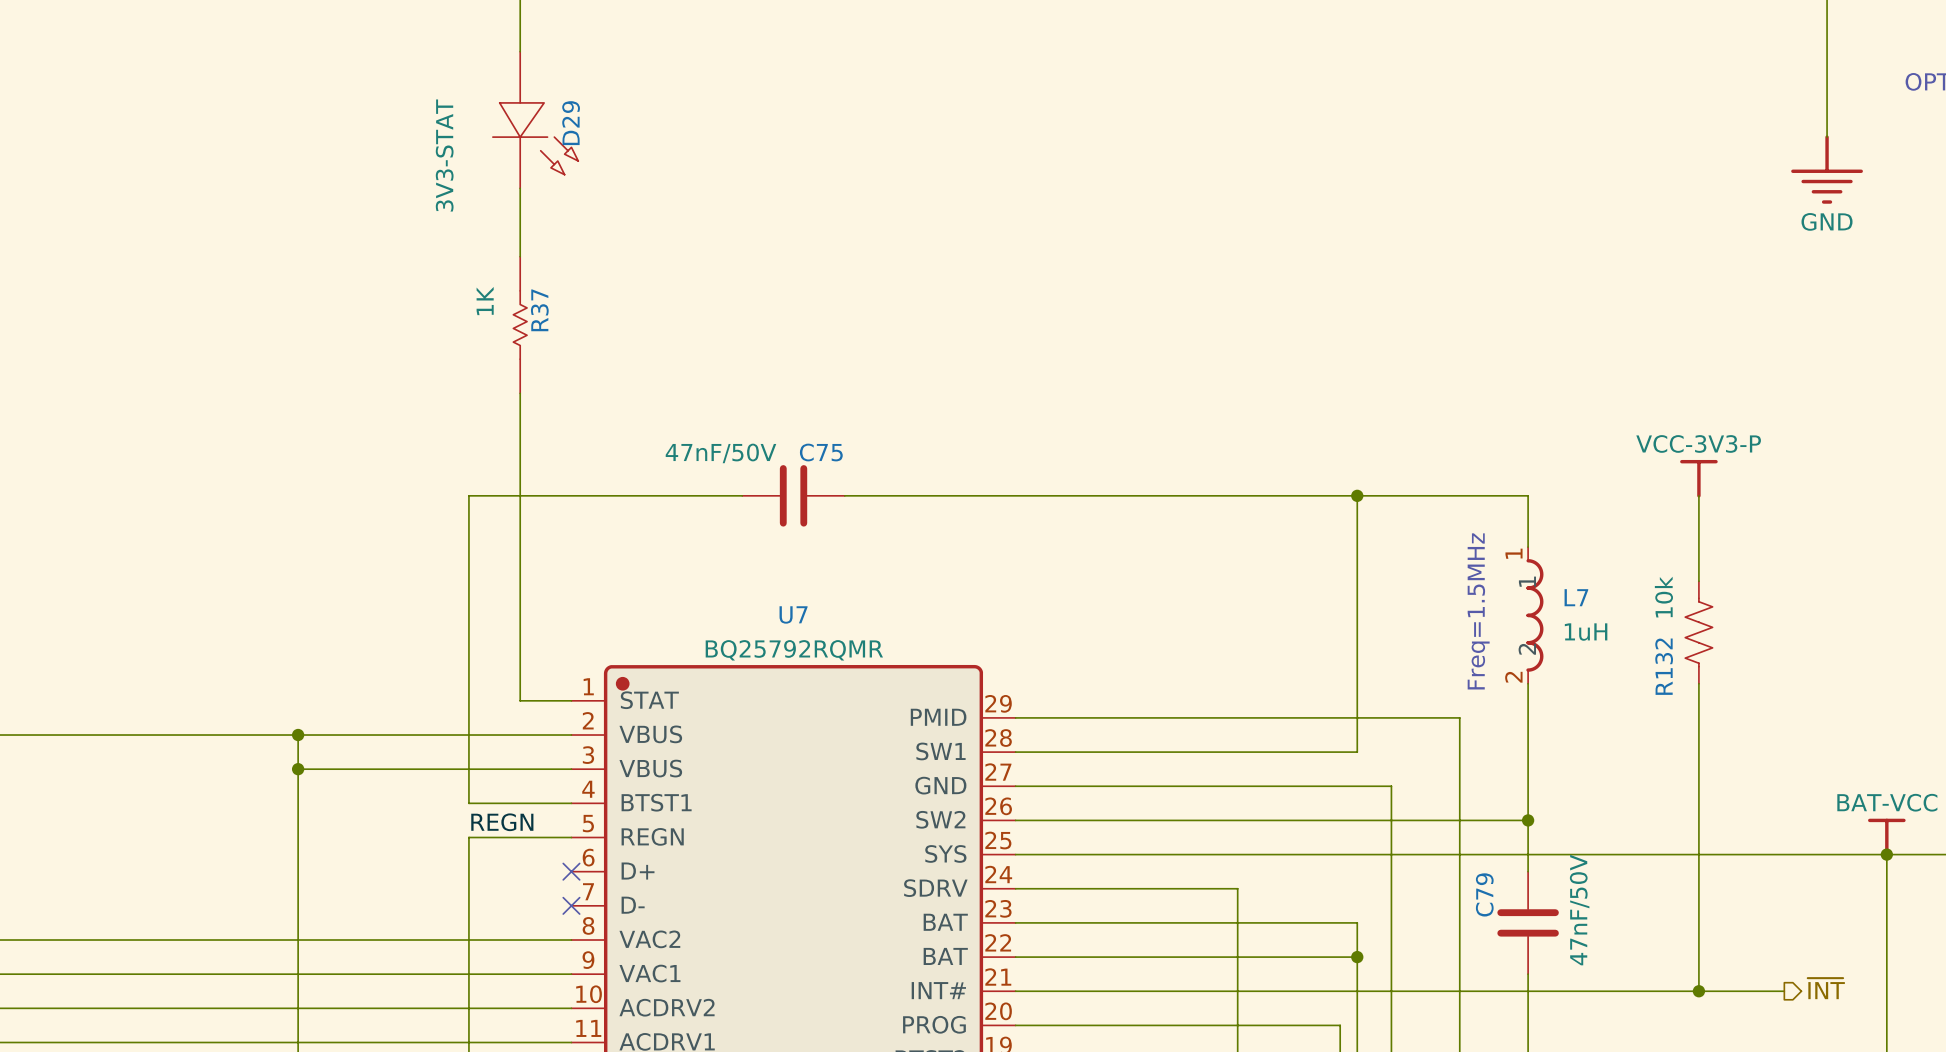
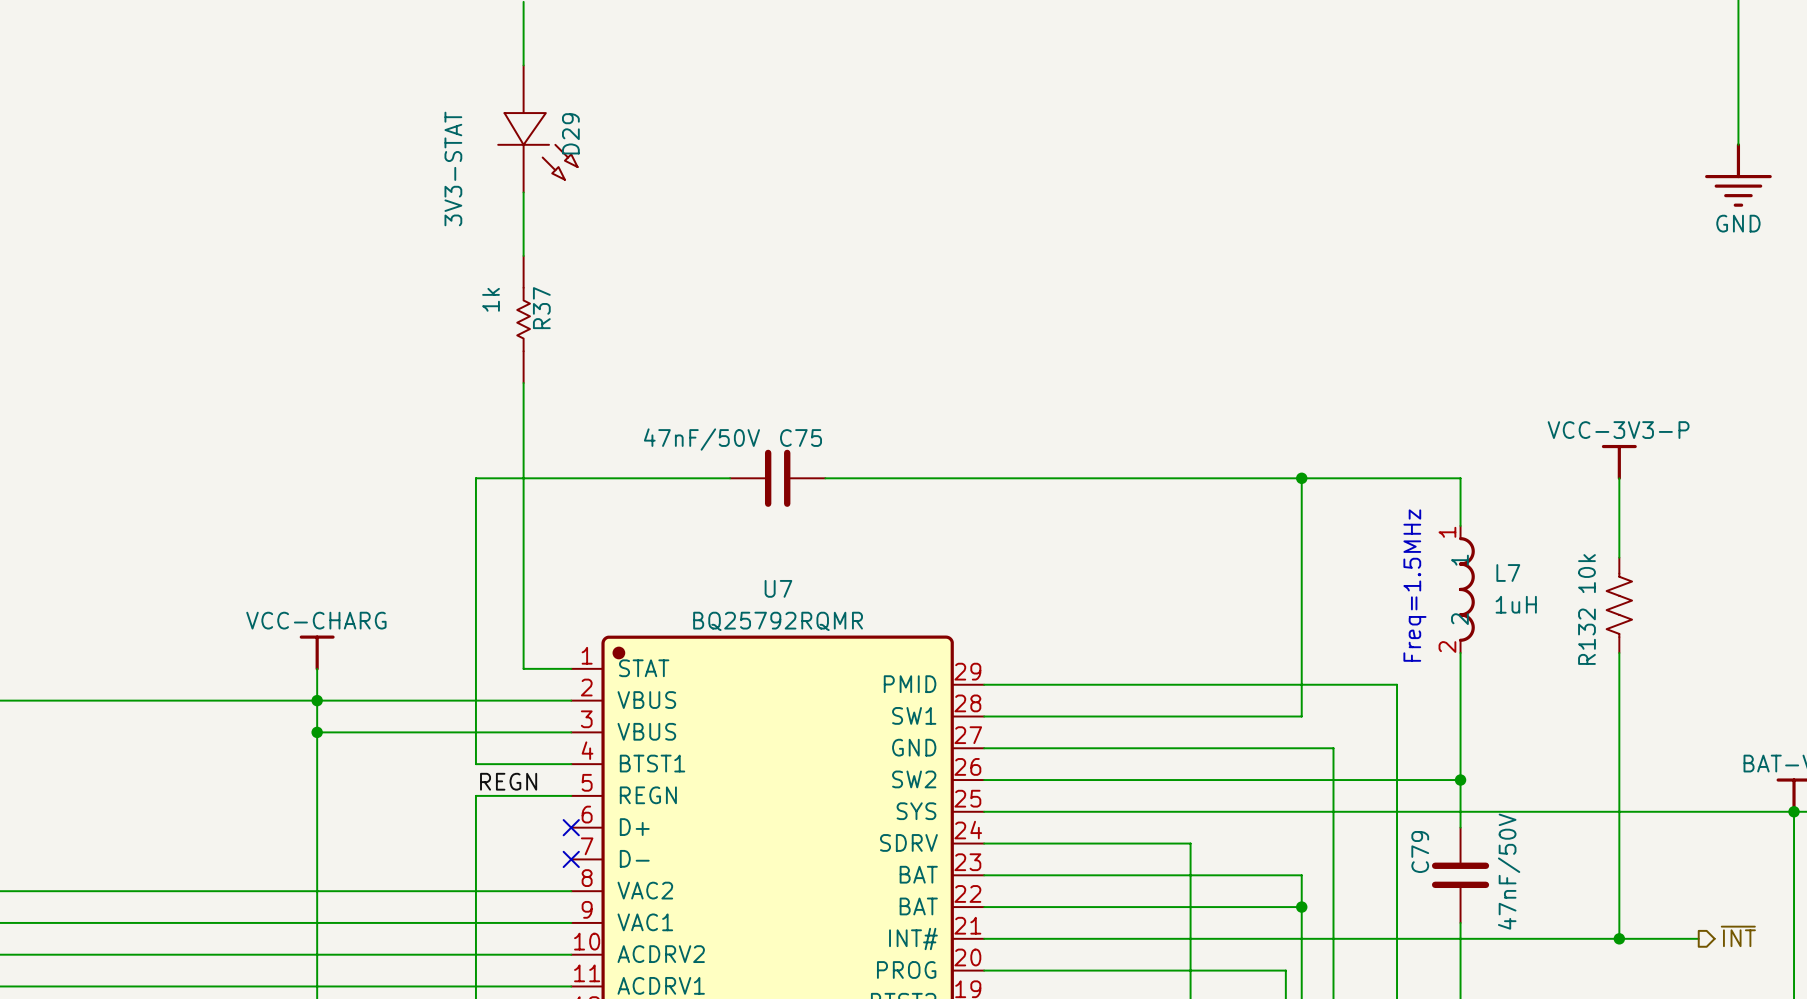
R37 value: 1K (485, 301) -> 1k (491, 299)
power symbol: none -> VCC-CHARG (317, 652)
wire: none -> (317, 668) (317, 700)

